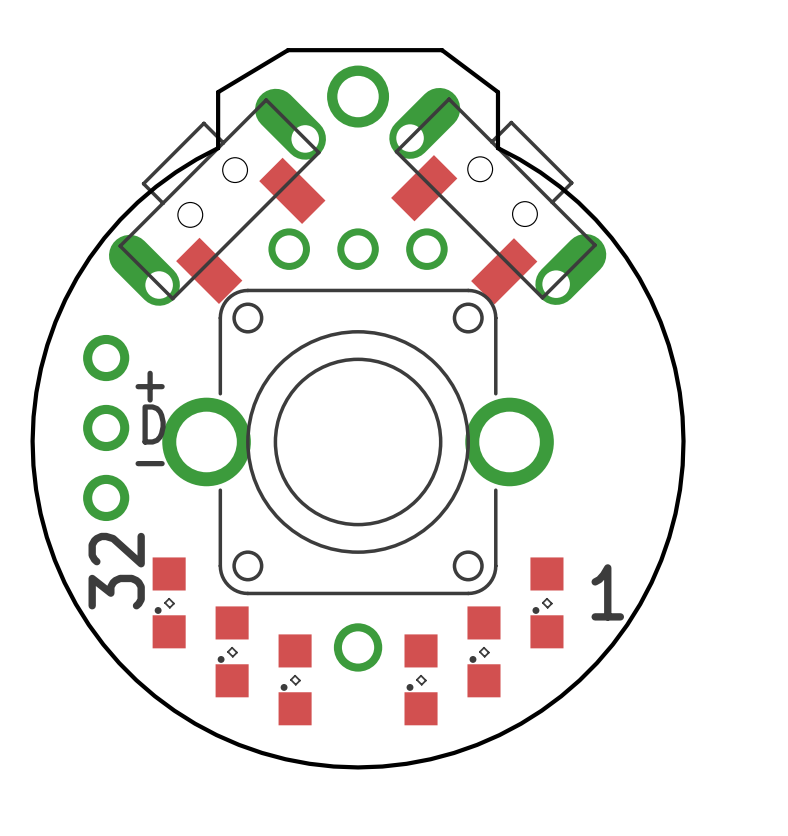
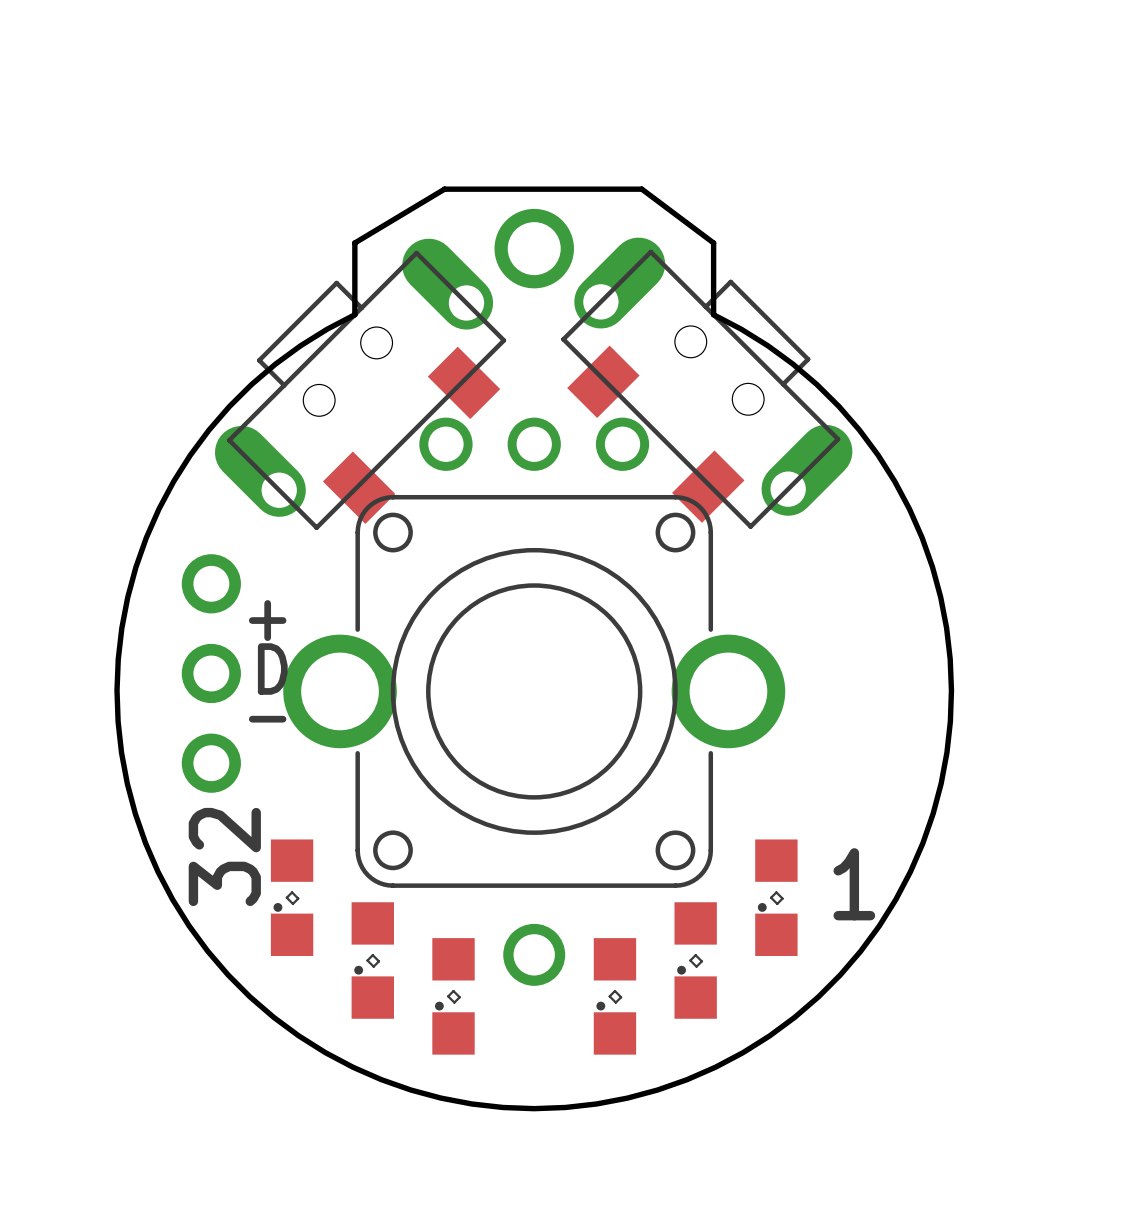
part footprint: [389, 87, 607, 305] -> [561, 237, 853, 529]
part footprint: [108, 88, 326, 306] -> [214, 238, 507, 530]

